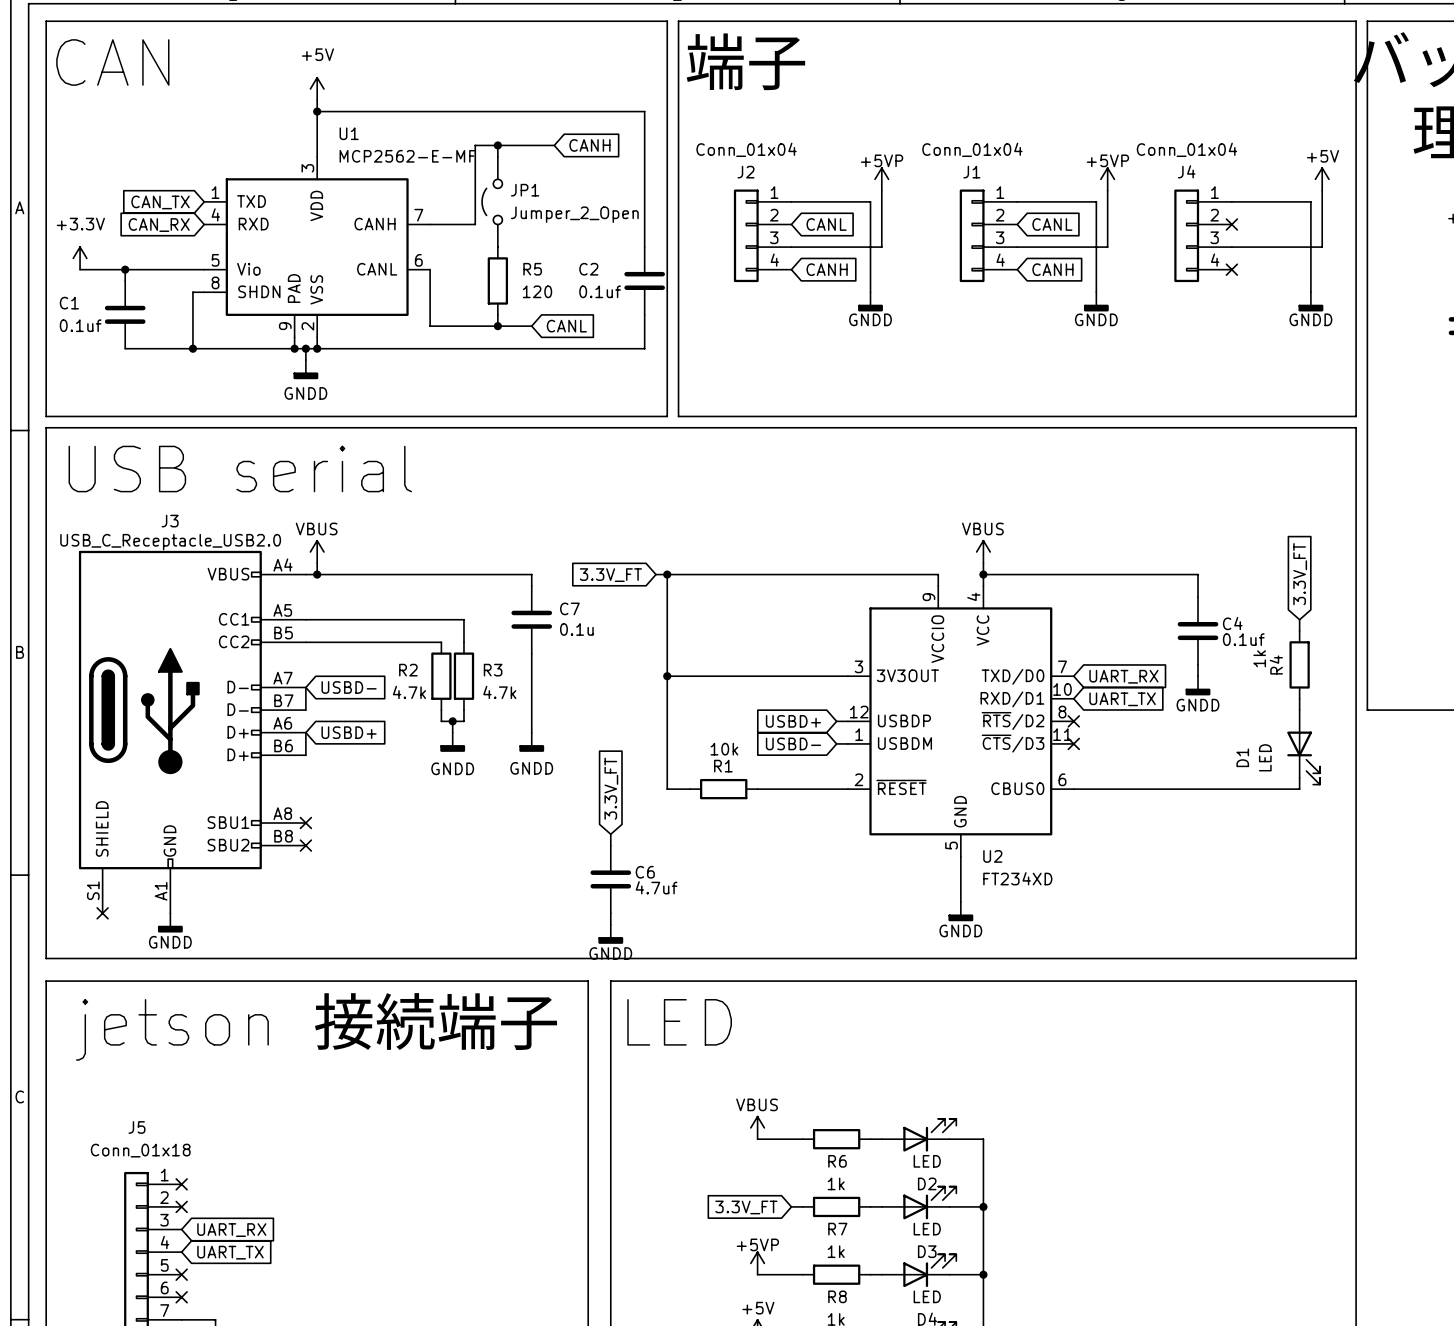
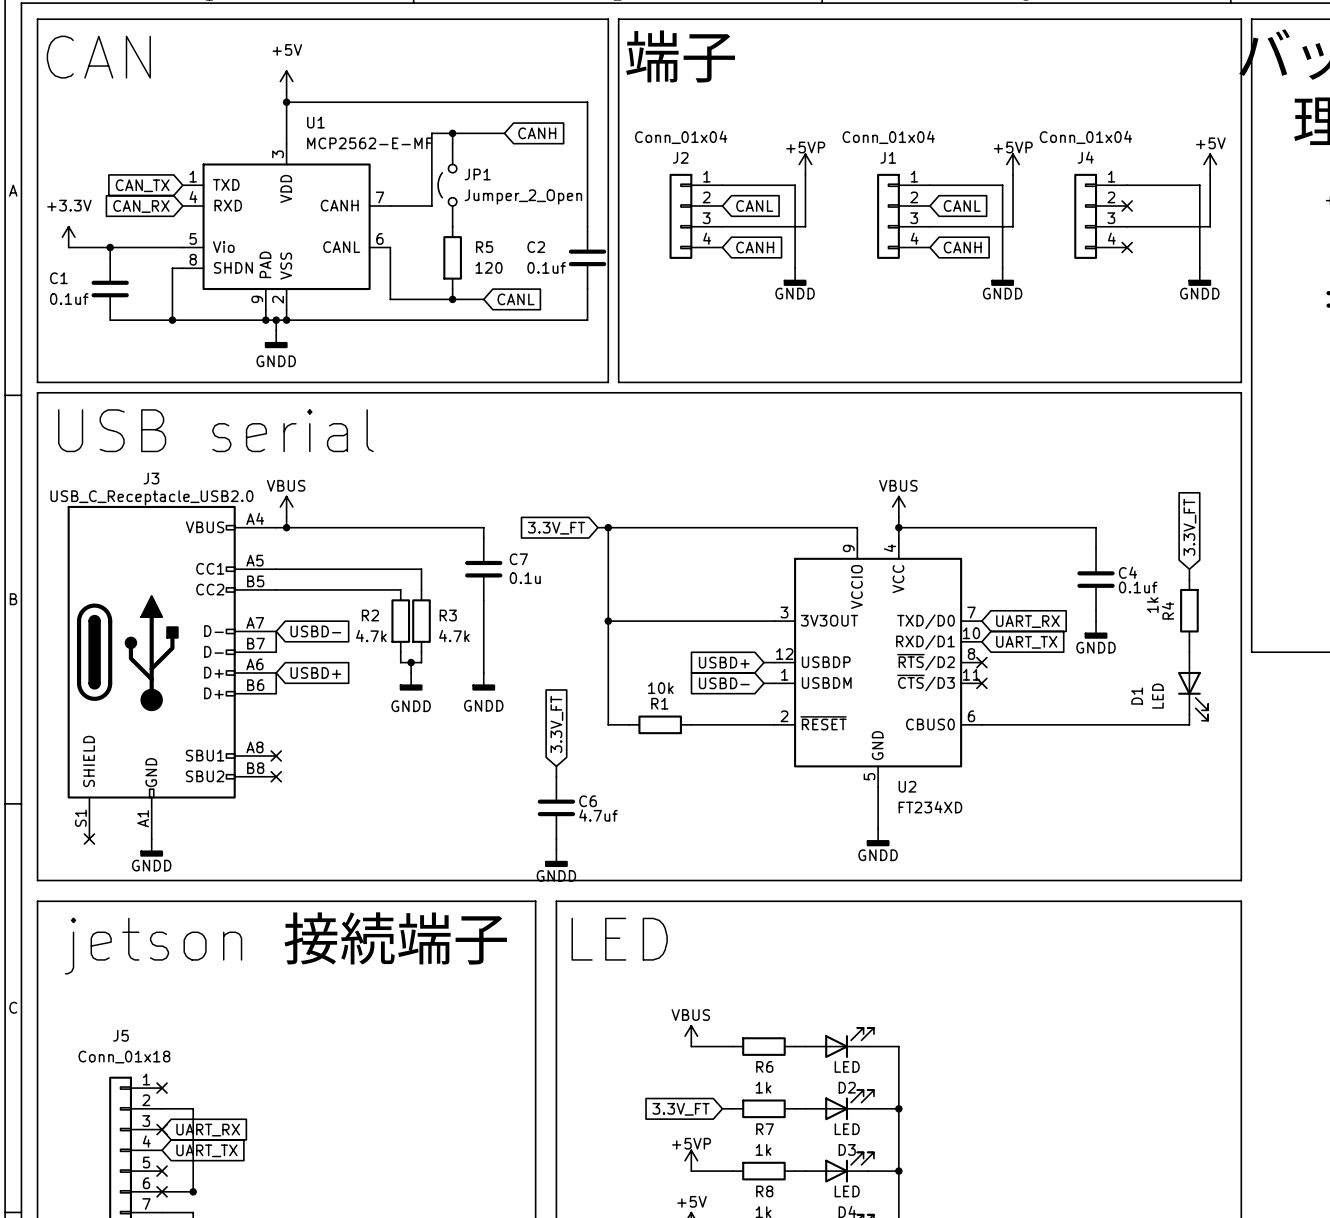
wire: none -> (162, 1108) (193, 1108) (193, 1191) (162, 1191)
no-connect mark position: (181, 1206) -> (162, 1129)
junction: none -> (193, 1191)

